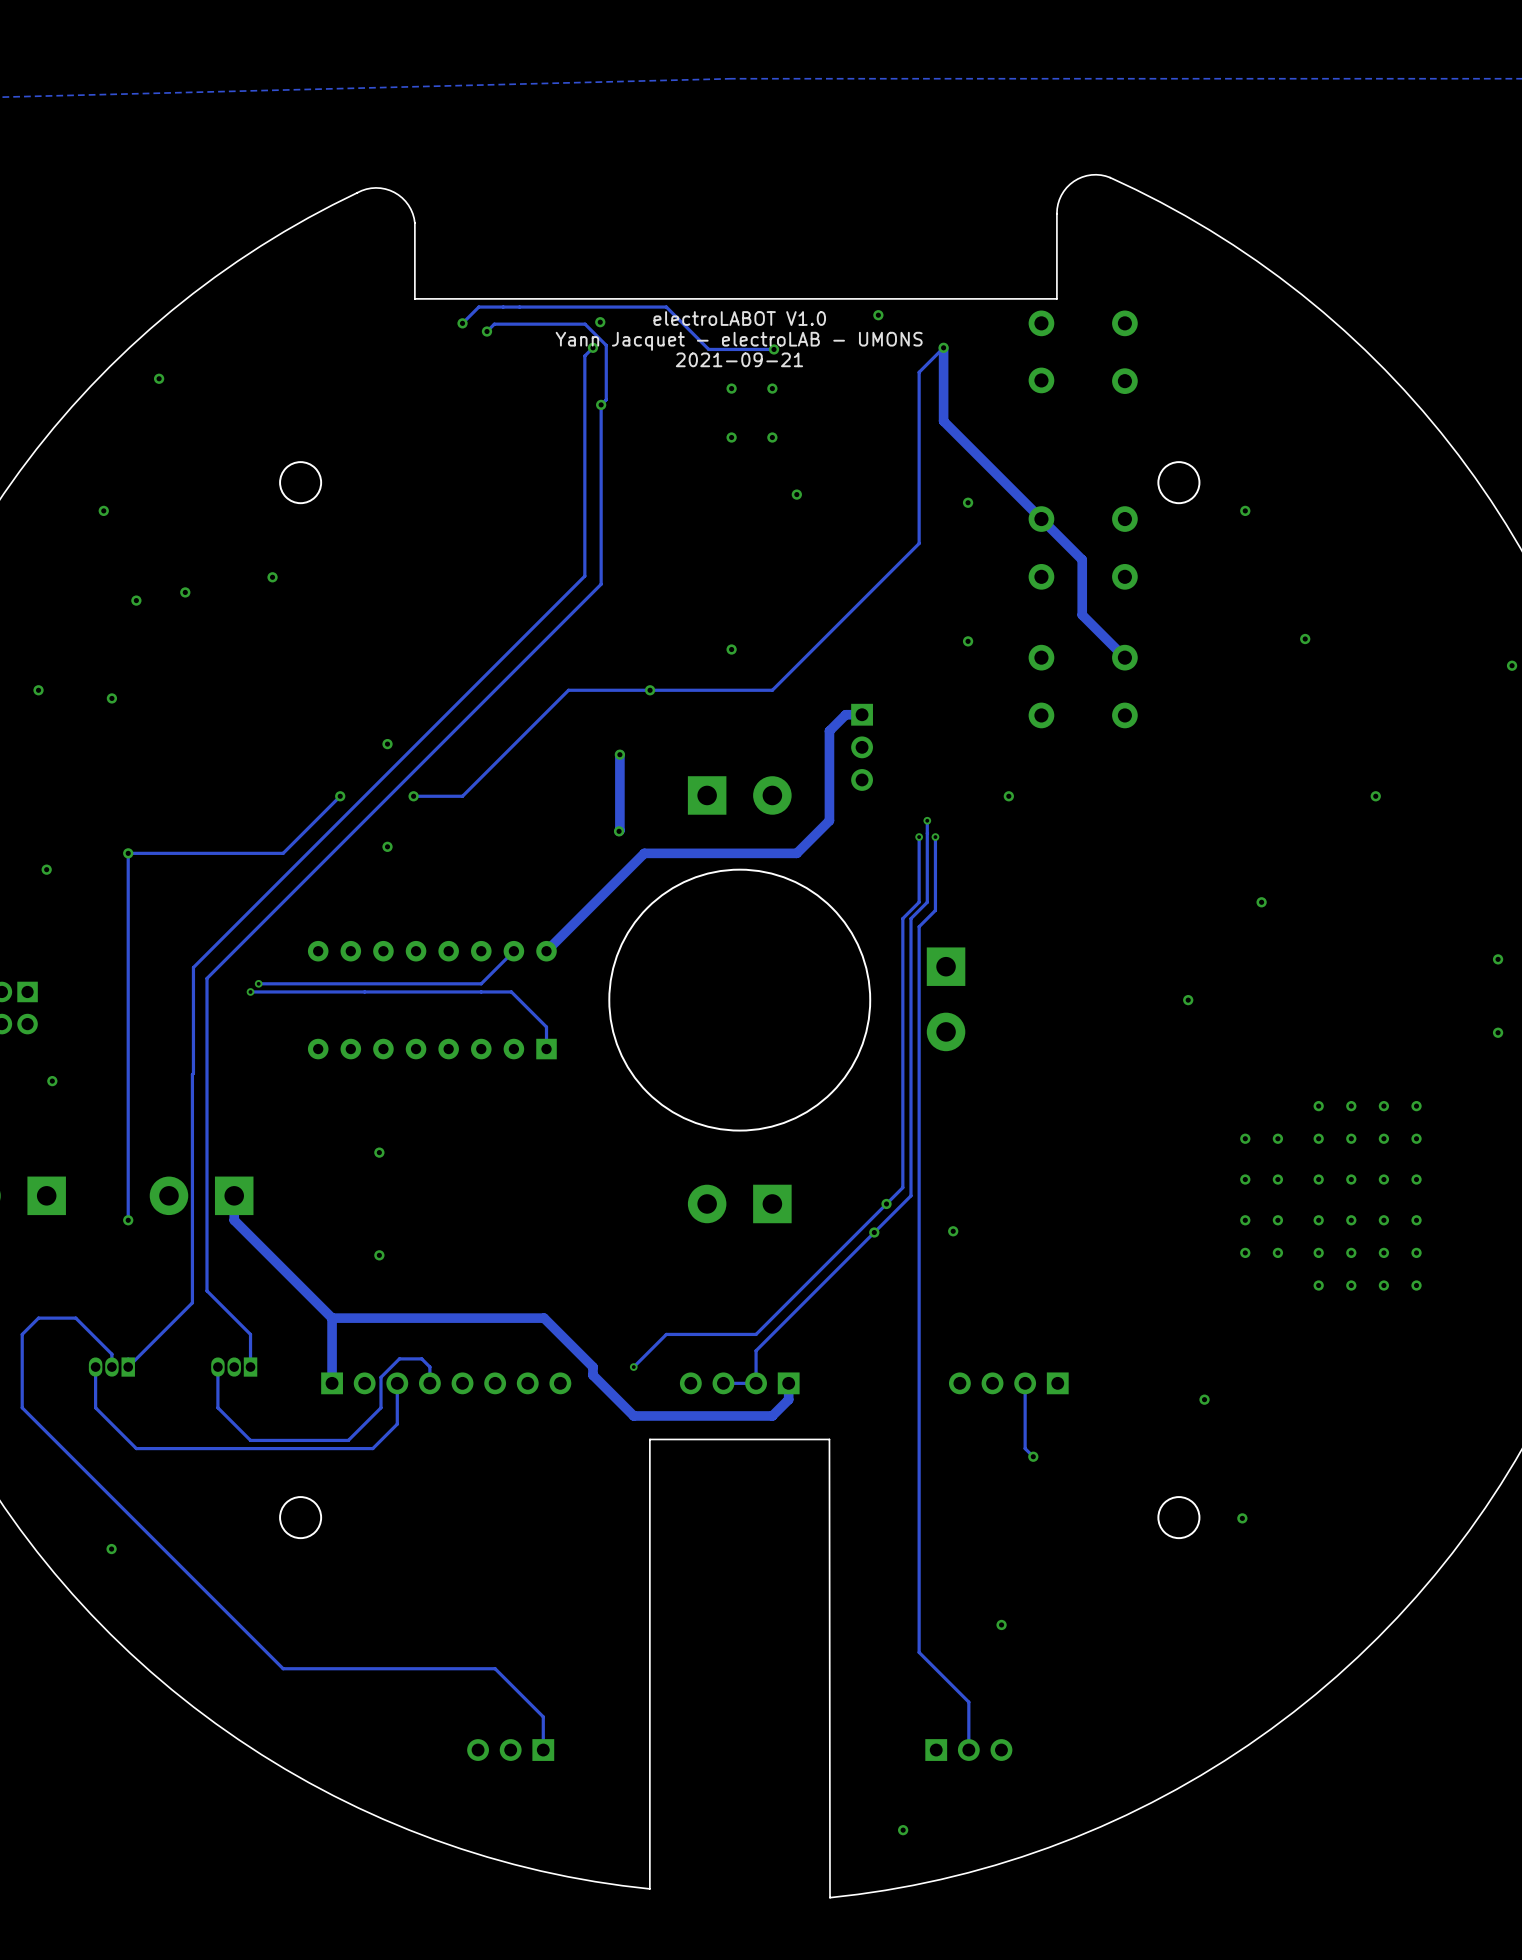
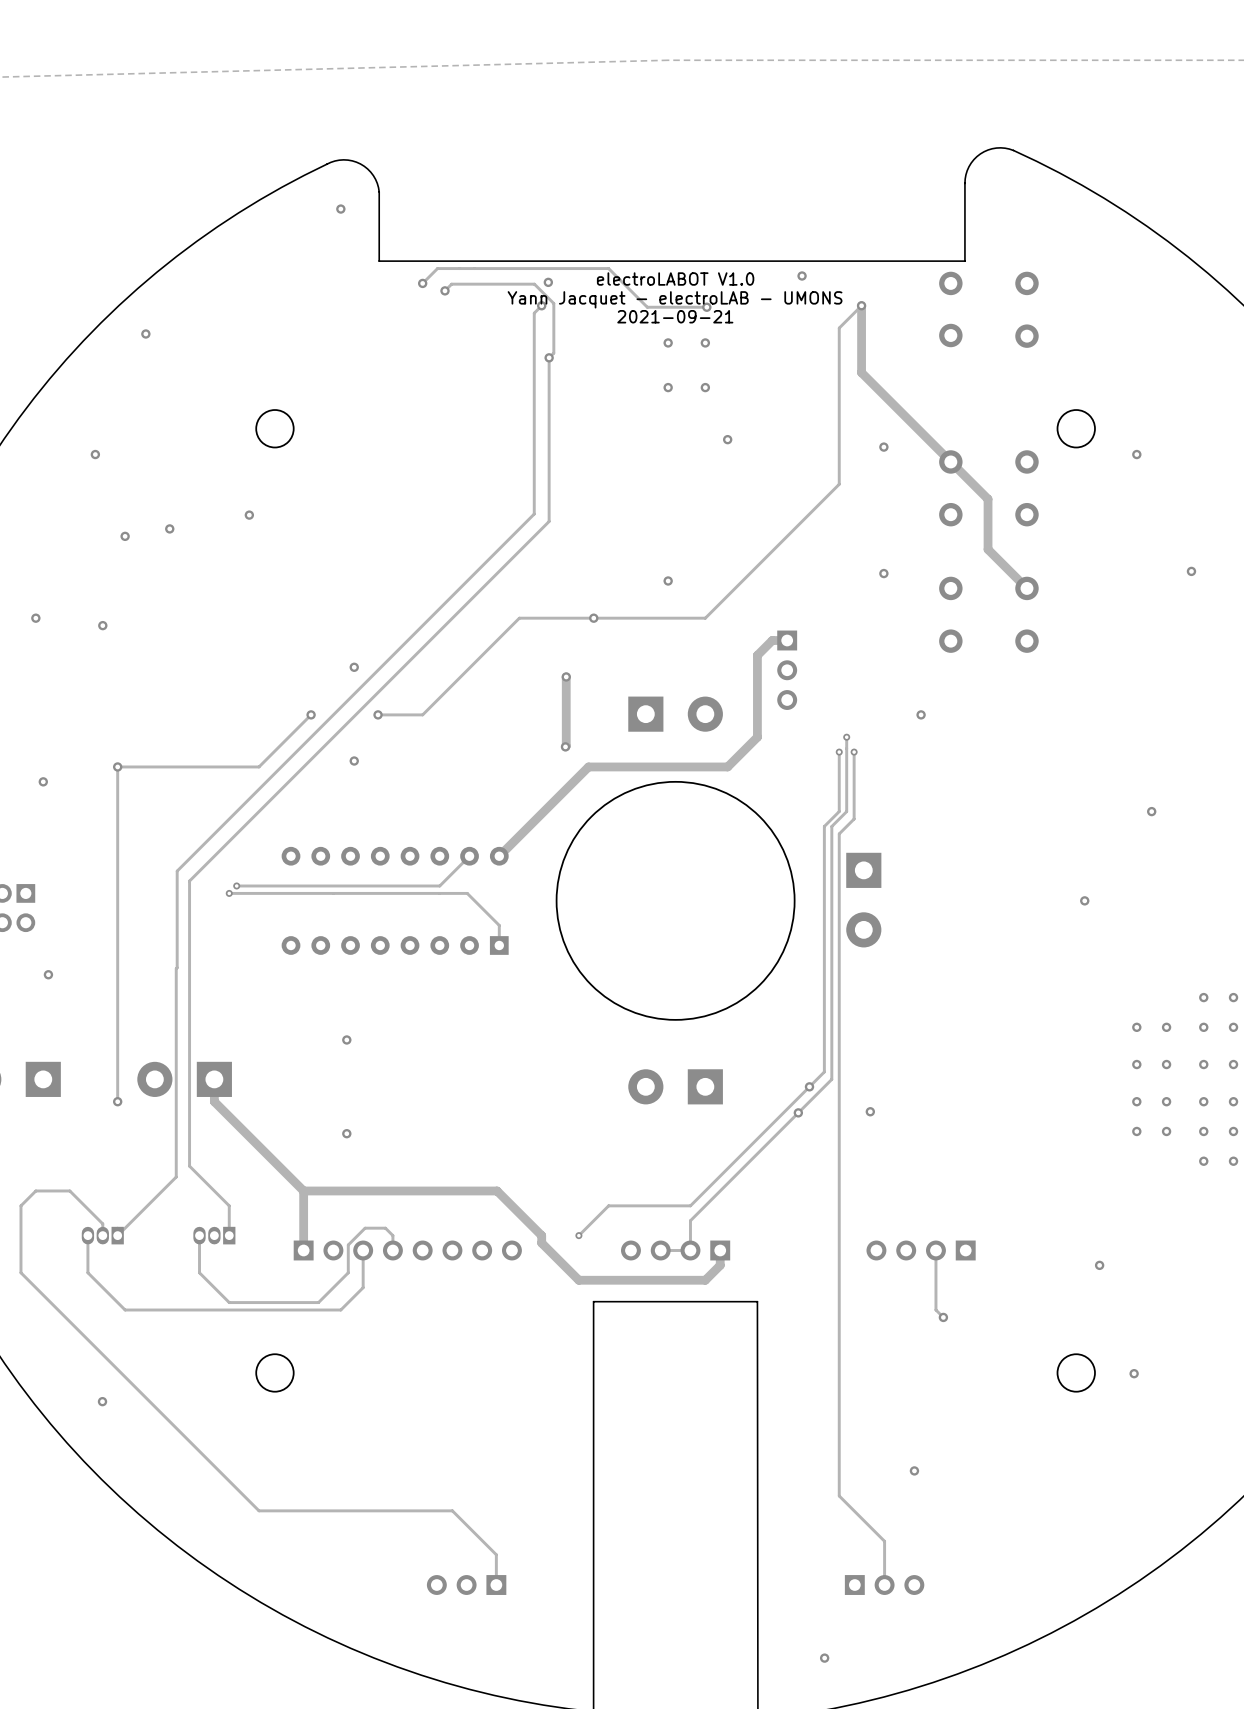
via: none -> (340, 209)

